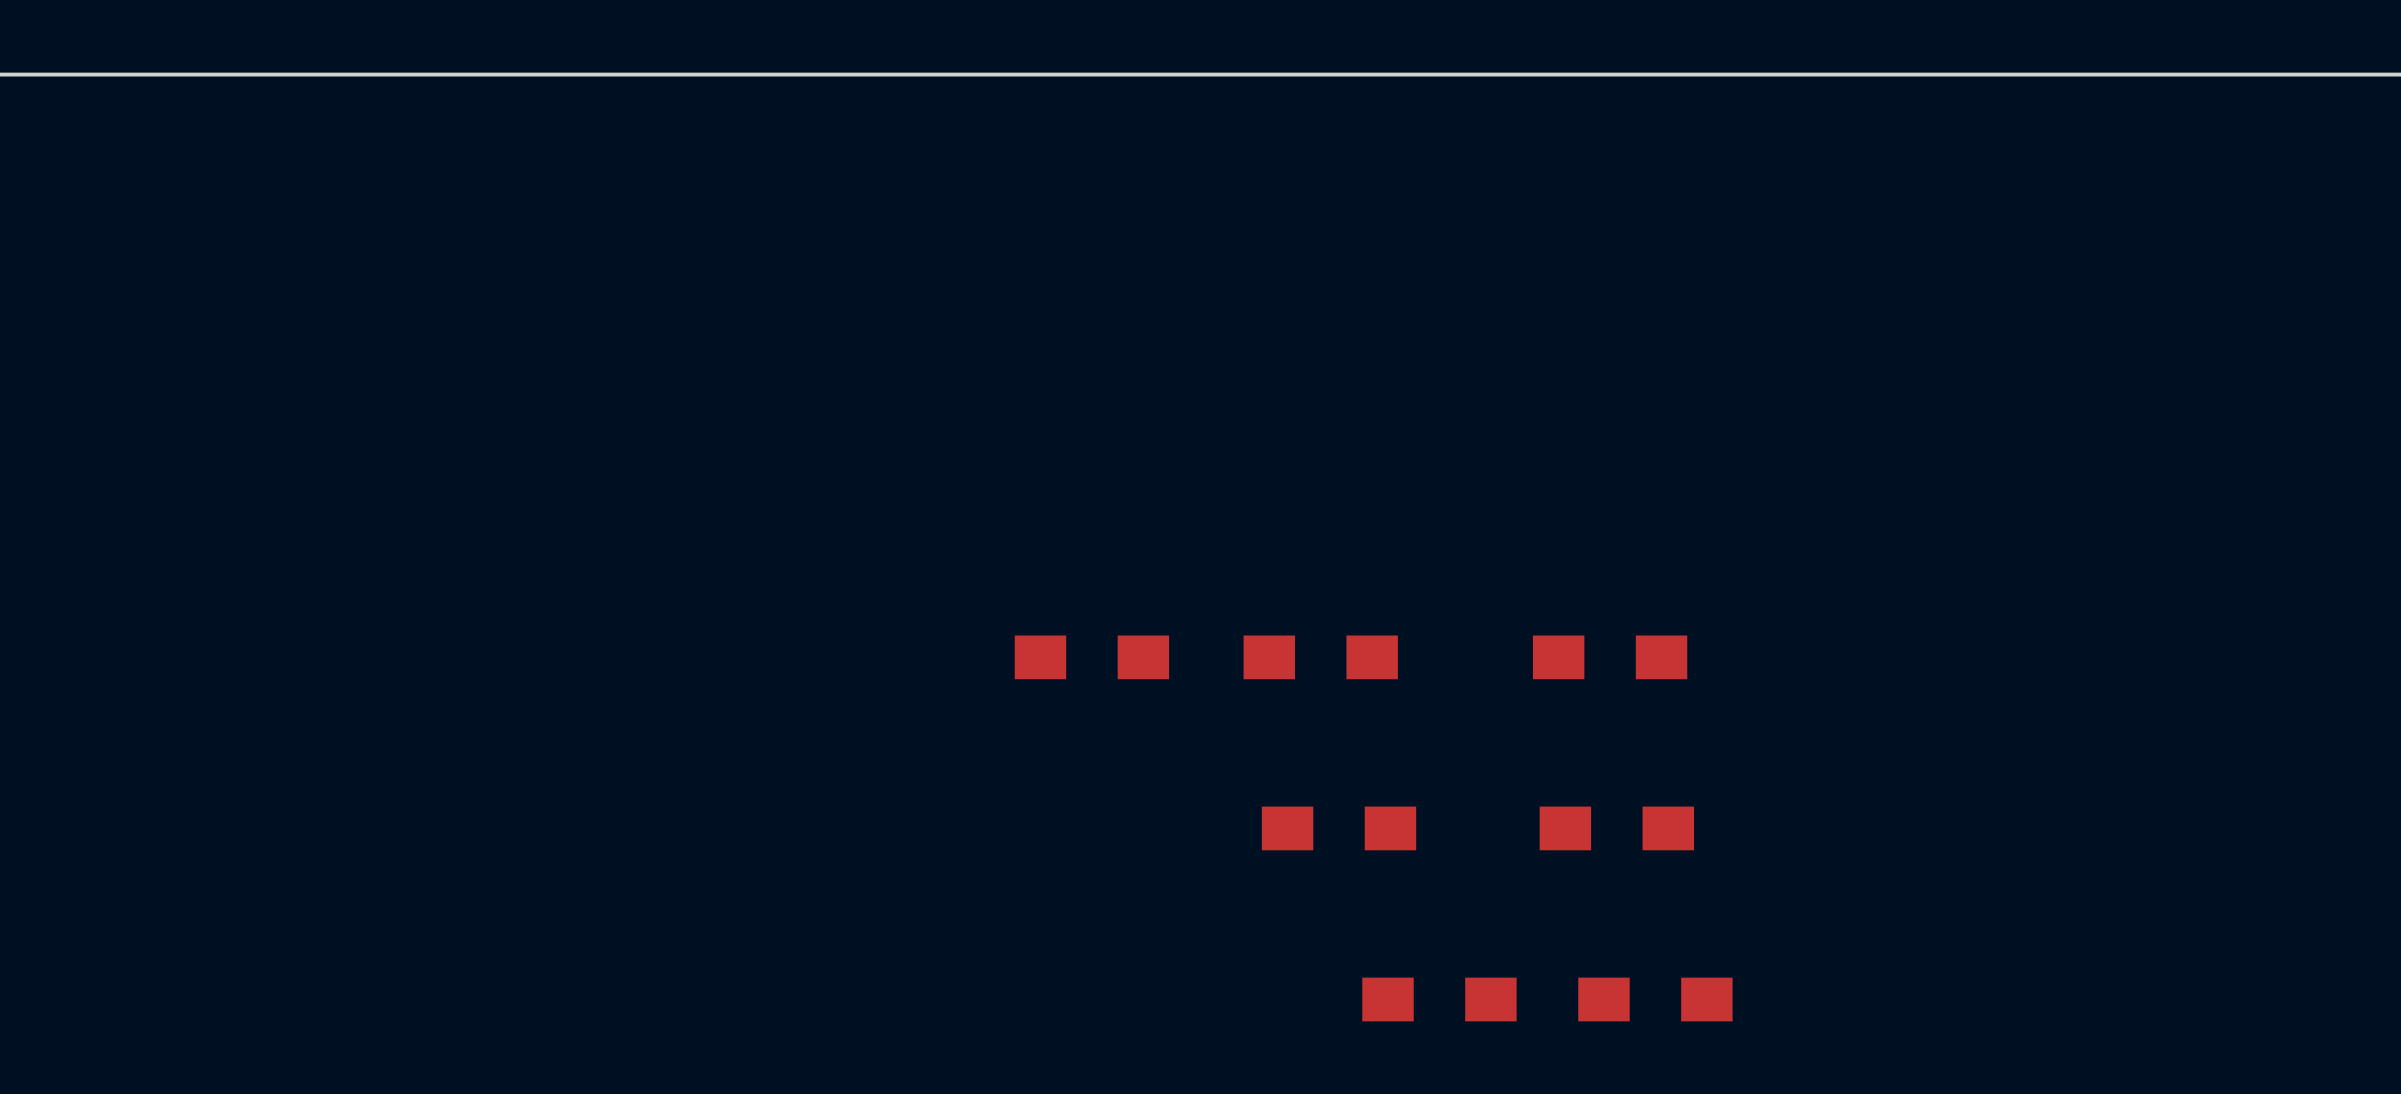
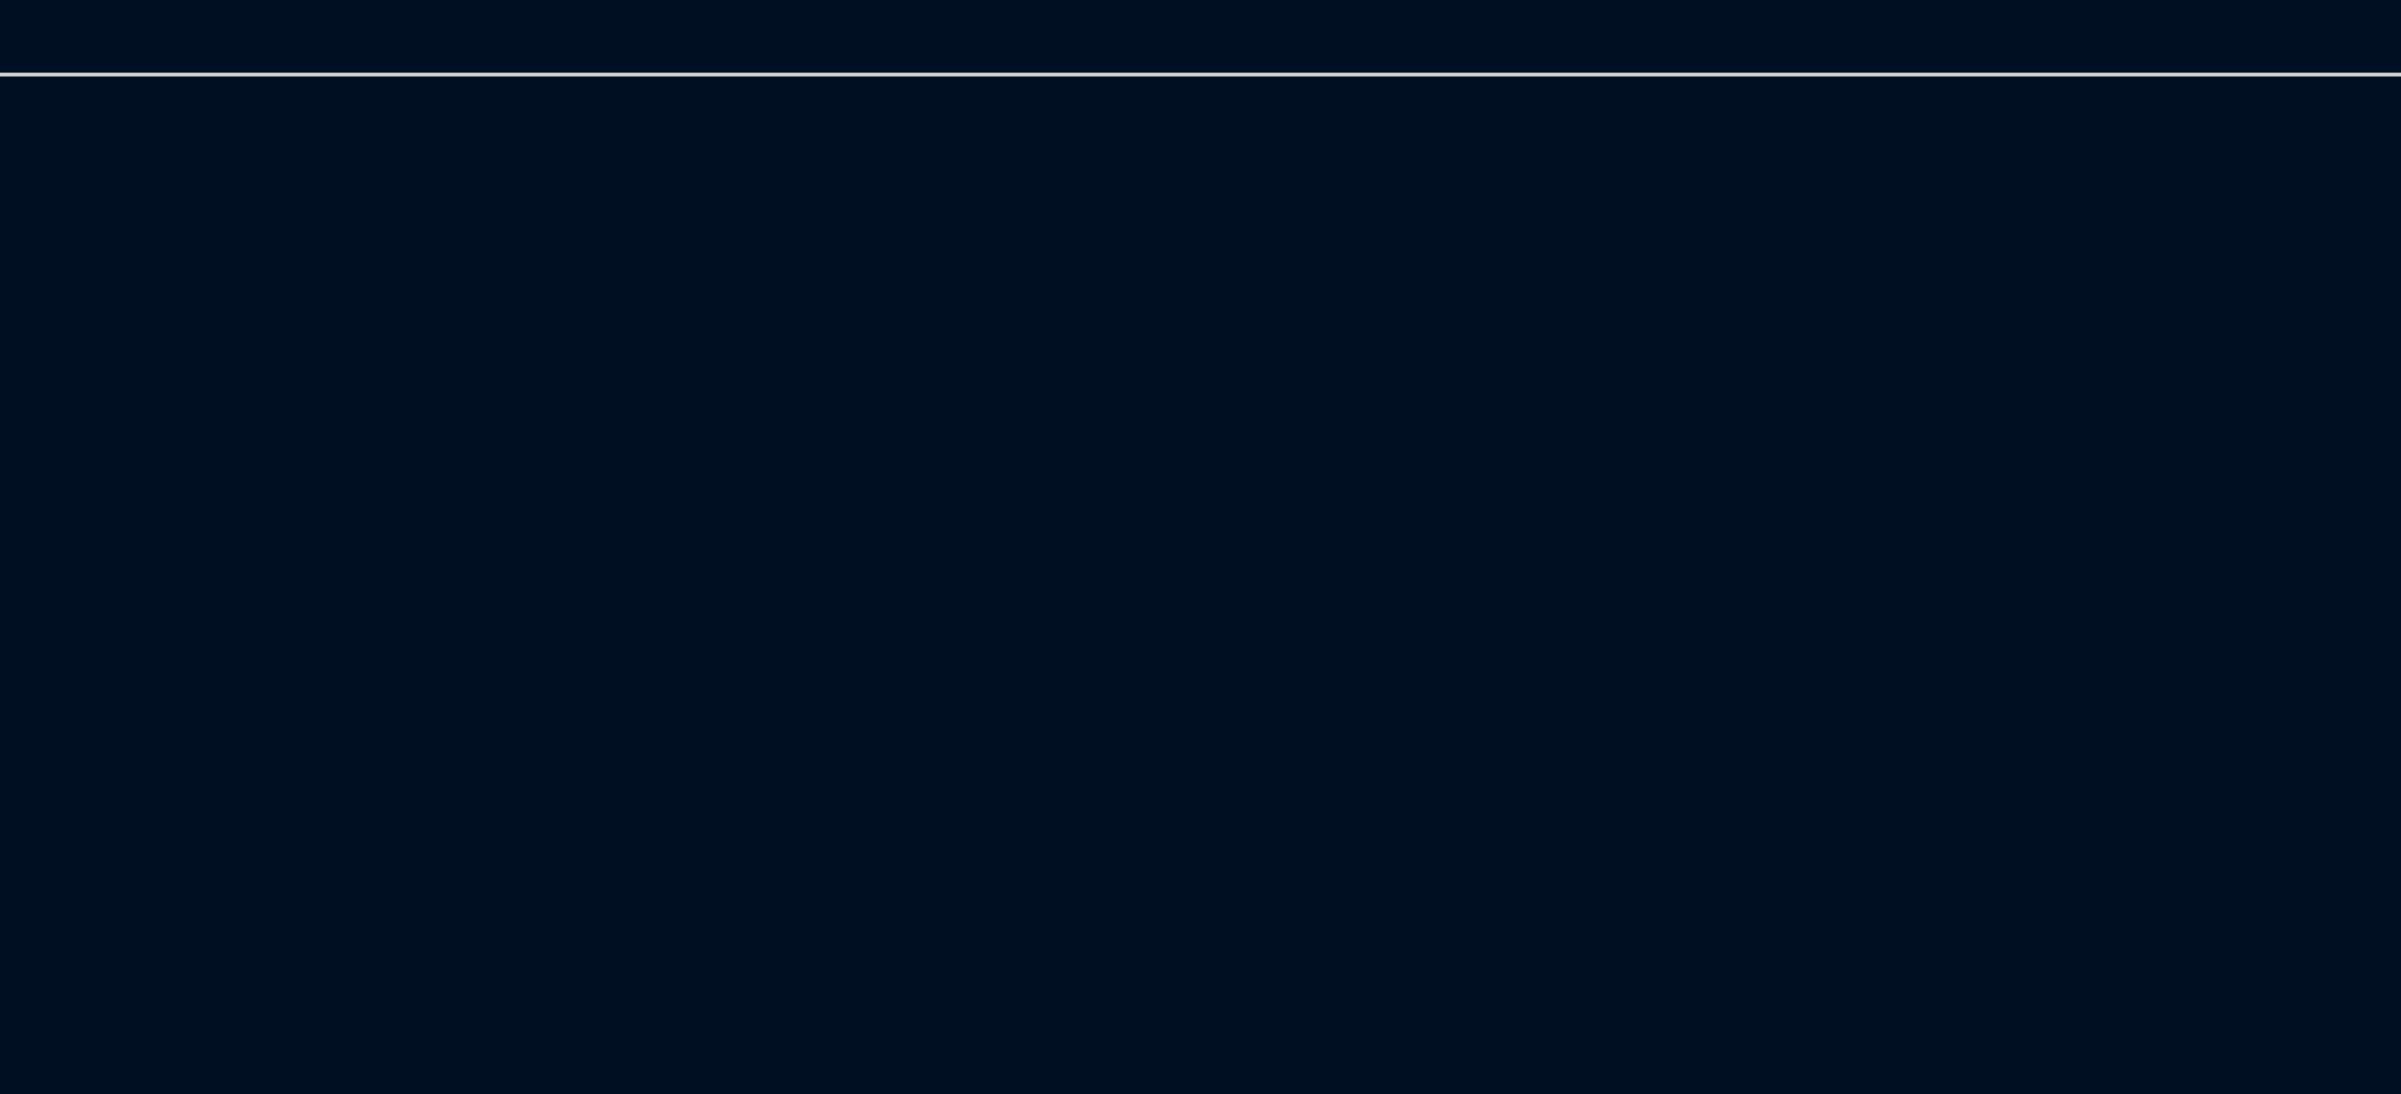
part: (1091, 657) -> none
part: (1320, 657) -> none
part: (1610, 657) -> none
part: (1339, 828) -> none
part: (1616, 828) -> none
part: (1439, 999) -> none
part: (1655, 999) -> none

